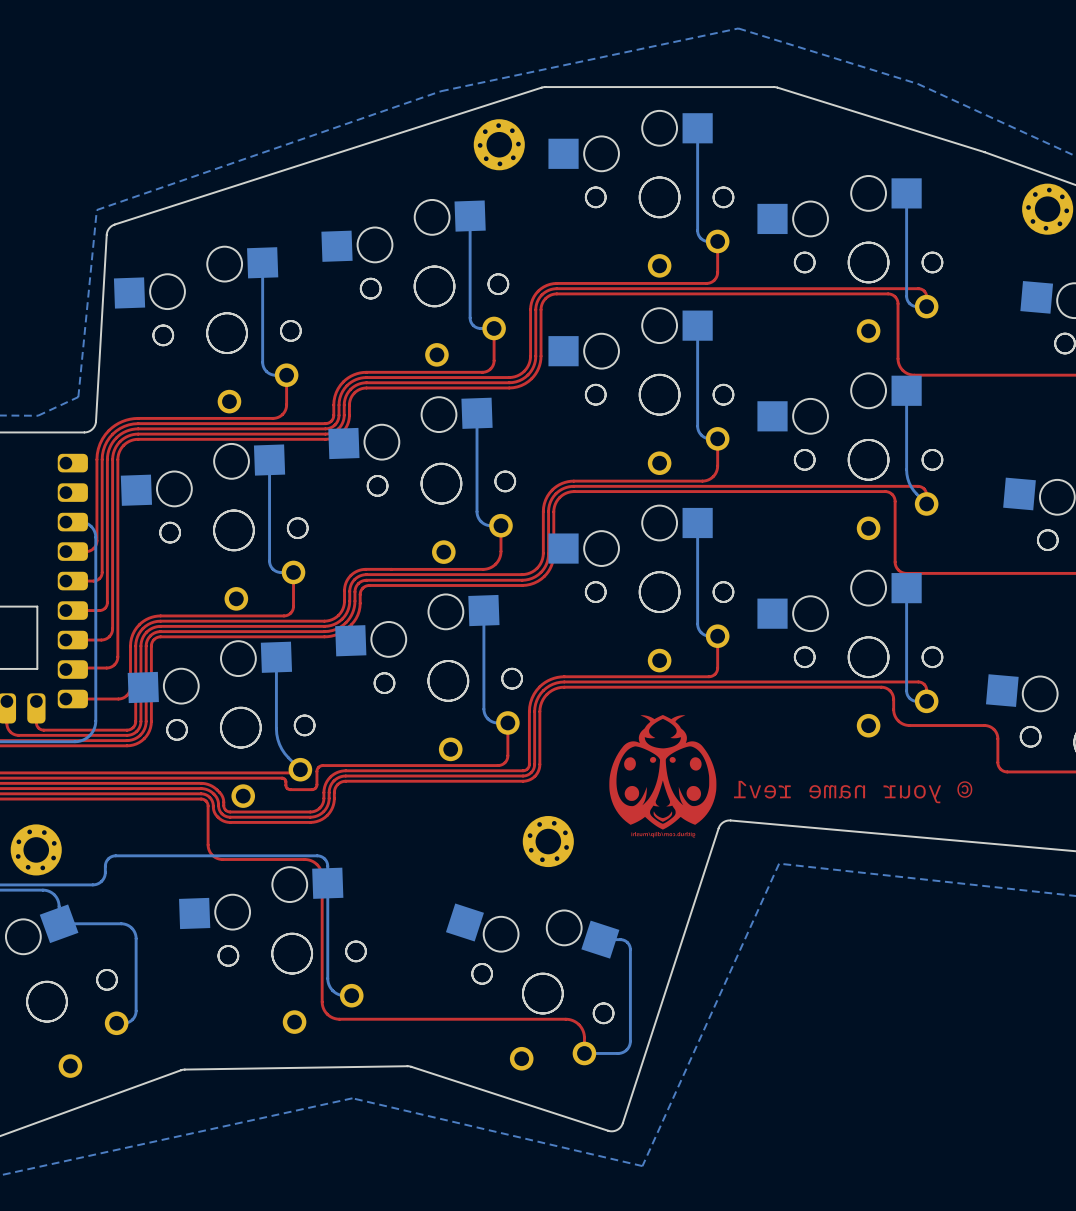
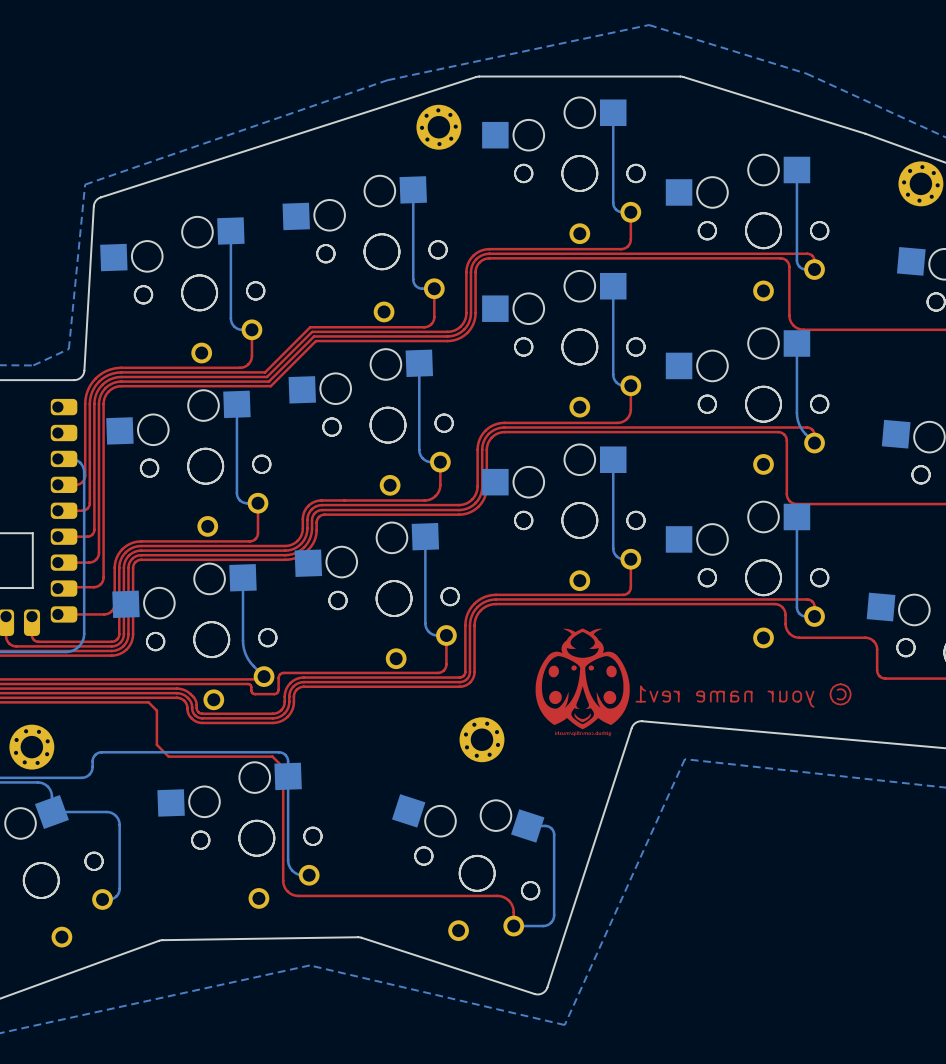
top track: (366, 372) (351, 376) (340, 385) (334, 396) (333, 416) (330, 421) (301, 423) -> (322, 327) (310, 327) (265, 372)
top track: (366, 377) (353, 380) (344, 388) (339, 397) (338, 419) (333, 426) (327, 428) (303, 428) -> (322, 331) (312, 331) (267, 376)
top track: (366, 382) (356, 385) (347, 393) (344, 402) (343, 420) (336, 430) (327, 433) (305, 434) -> (322, 336) (314, 336) (268, 381)
top track: (366, 387) (357, 390) (351, 396) (348, 422) (342, 432) (331, 438) (308, 439) -> (322, 341) (315, 341) (270, 386)
top track: (169, 799) (201, 799) (206, 801) (208, 846) (215, 857) (222, 859) (308, 859) (318, 865) (322, 876) -> (148, 702) (156, 710) (156, 744) (168, 756) (272, 756) (283, 767) (283, 770)

